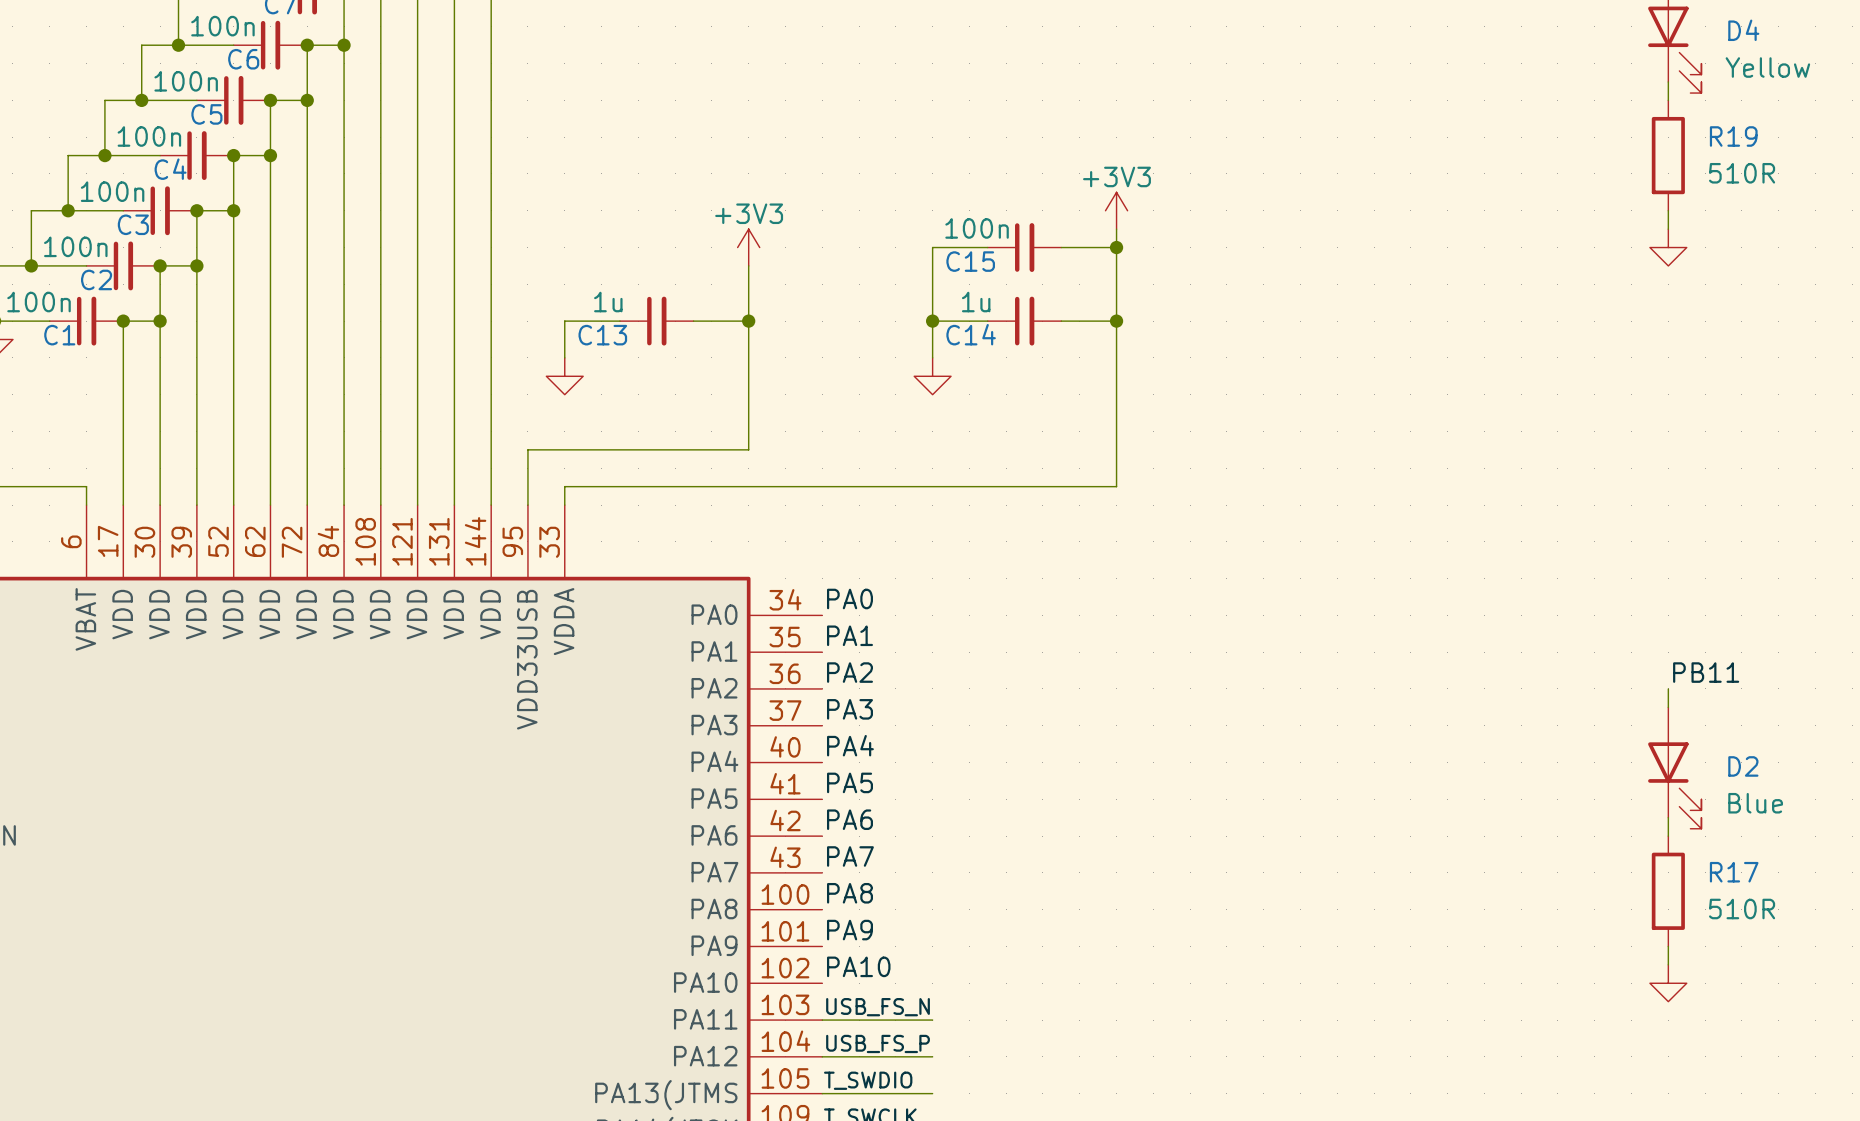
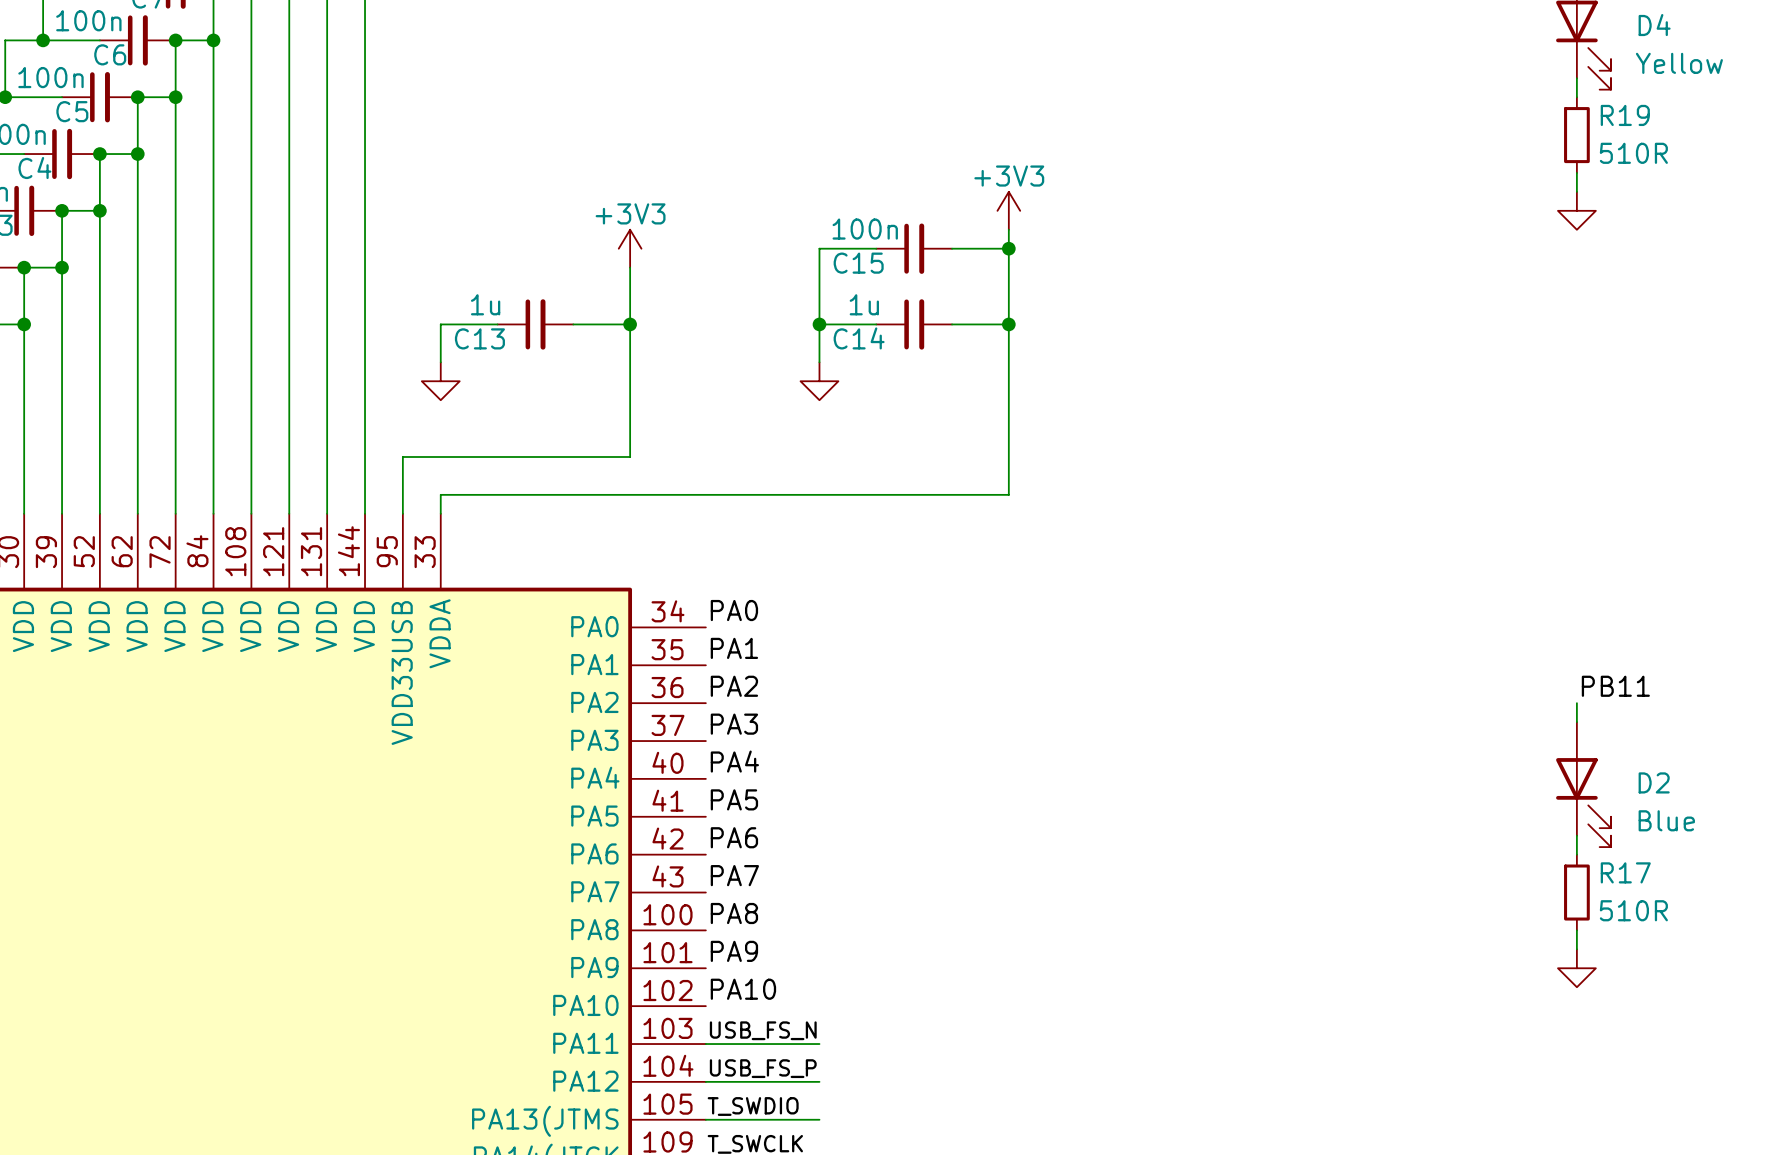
R19 symbol: [1651, 100, 1685, 211] -> [1564, 97, 1590, 173]
wire: (1668, 210) (1668, 229) -> (1576, 172) (1576, 191)
power symbol position: (1668, 247) -> (1576, 210)
R17 symbol: [1651, 836, 1685, 947] -> [1564, 854, 1590, 931]
wire: (1668, 946) (1668, 964) -> (1576, 930) (1576, 949)
power symbol position: (1668, 983) -> (1576, 968)

